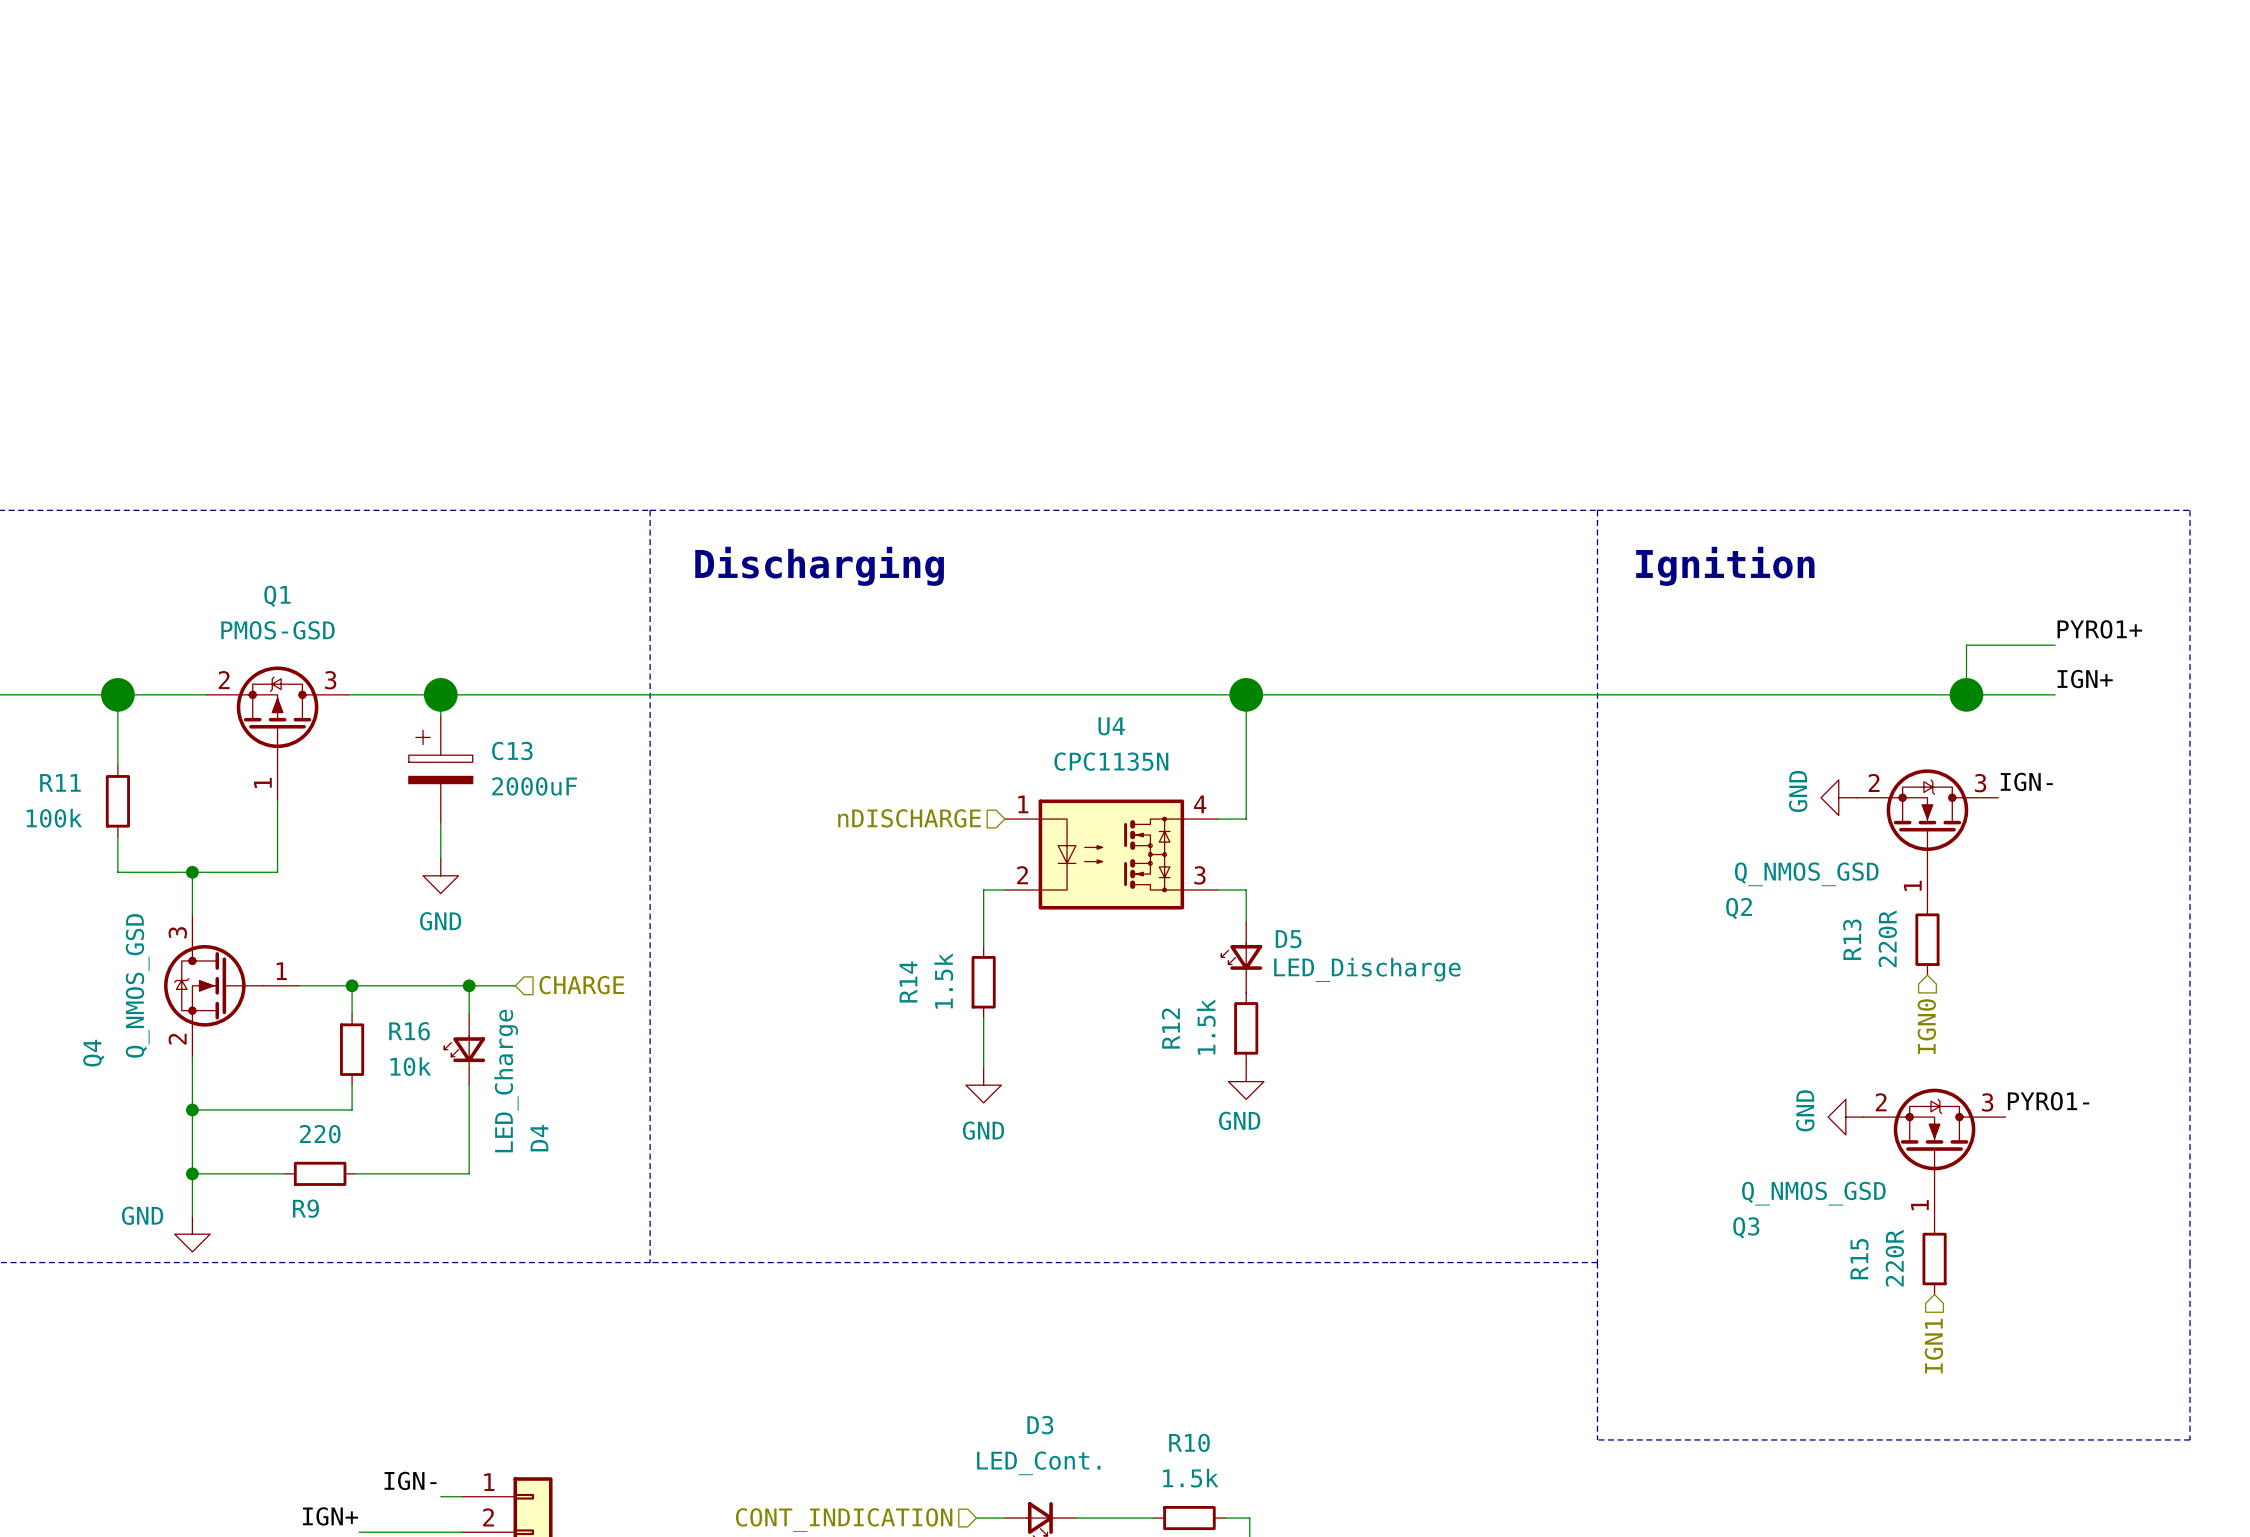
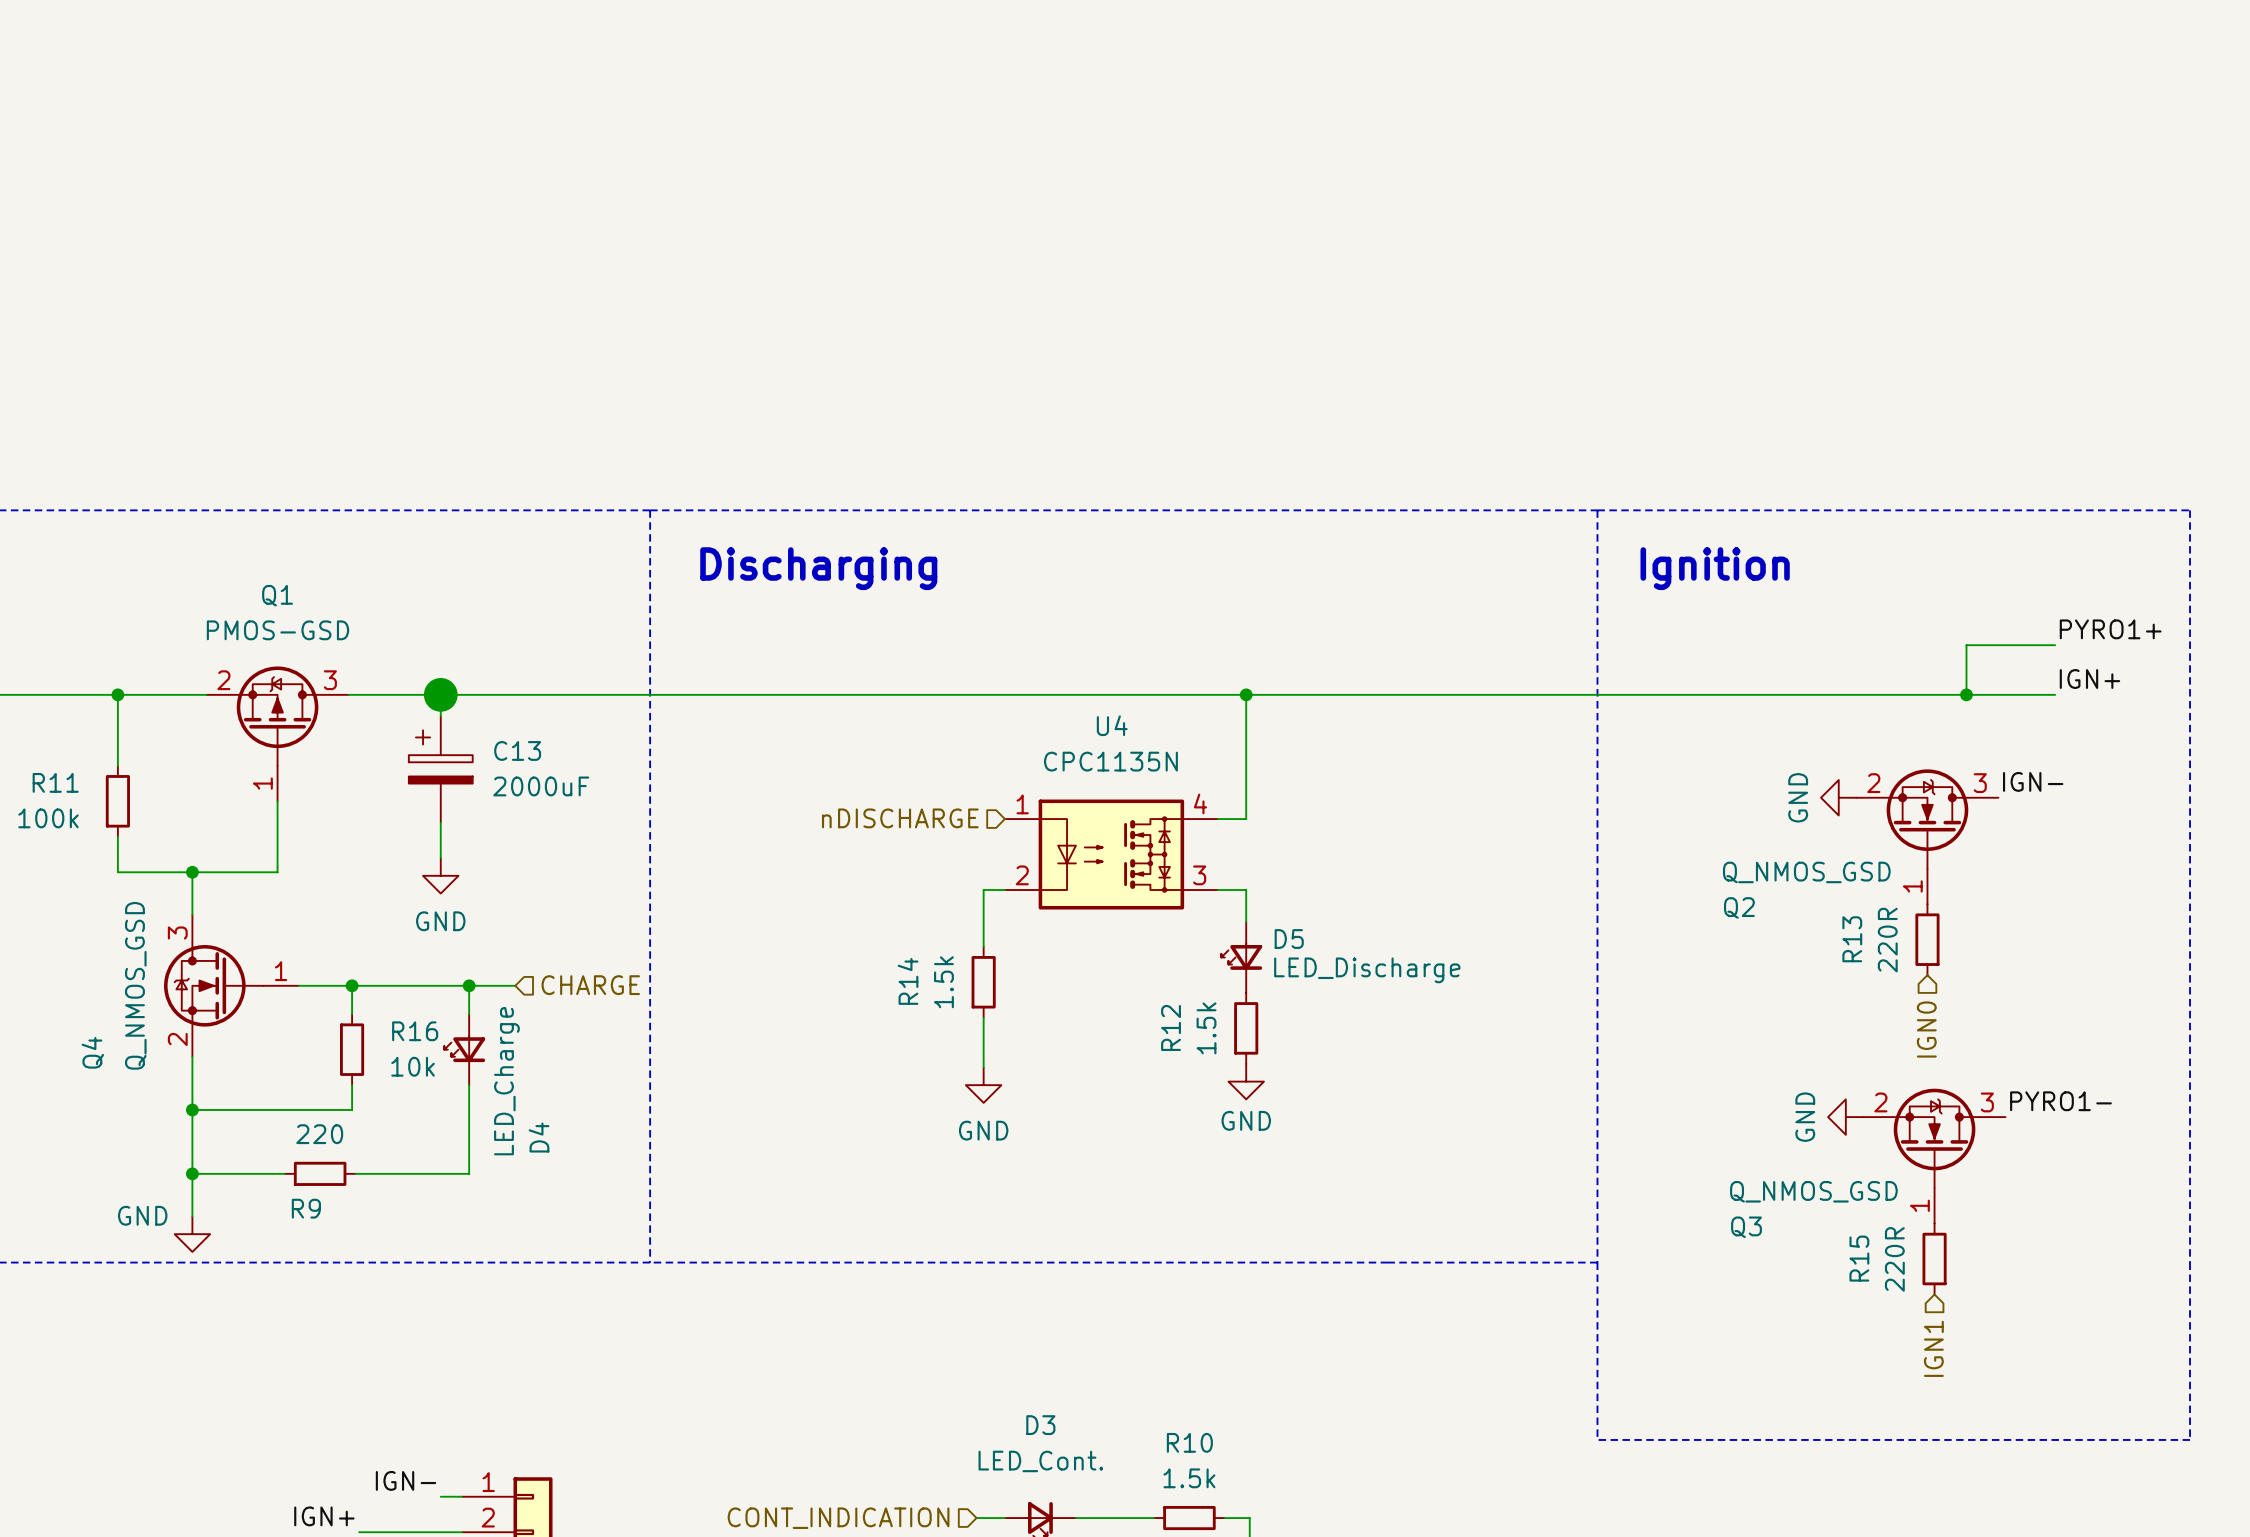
junction size: [101, 678, 135, 712] -> [111, 688, 125, 702]
junction size: [1229, 678, 1264, 712] -> [1239, 688, 1253, 702]
junction size: [1949, 678, 1984, 712] -> [1960, 688, 1973, 702]

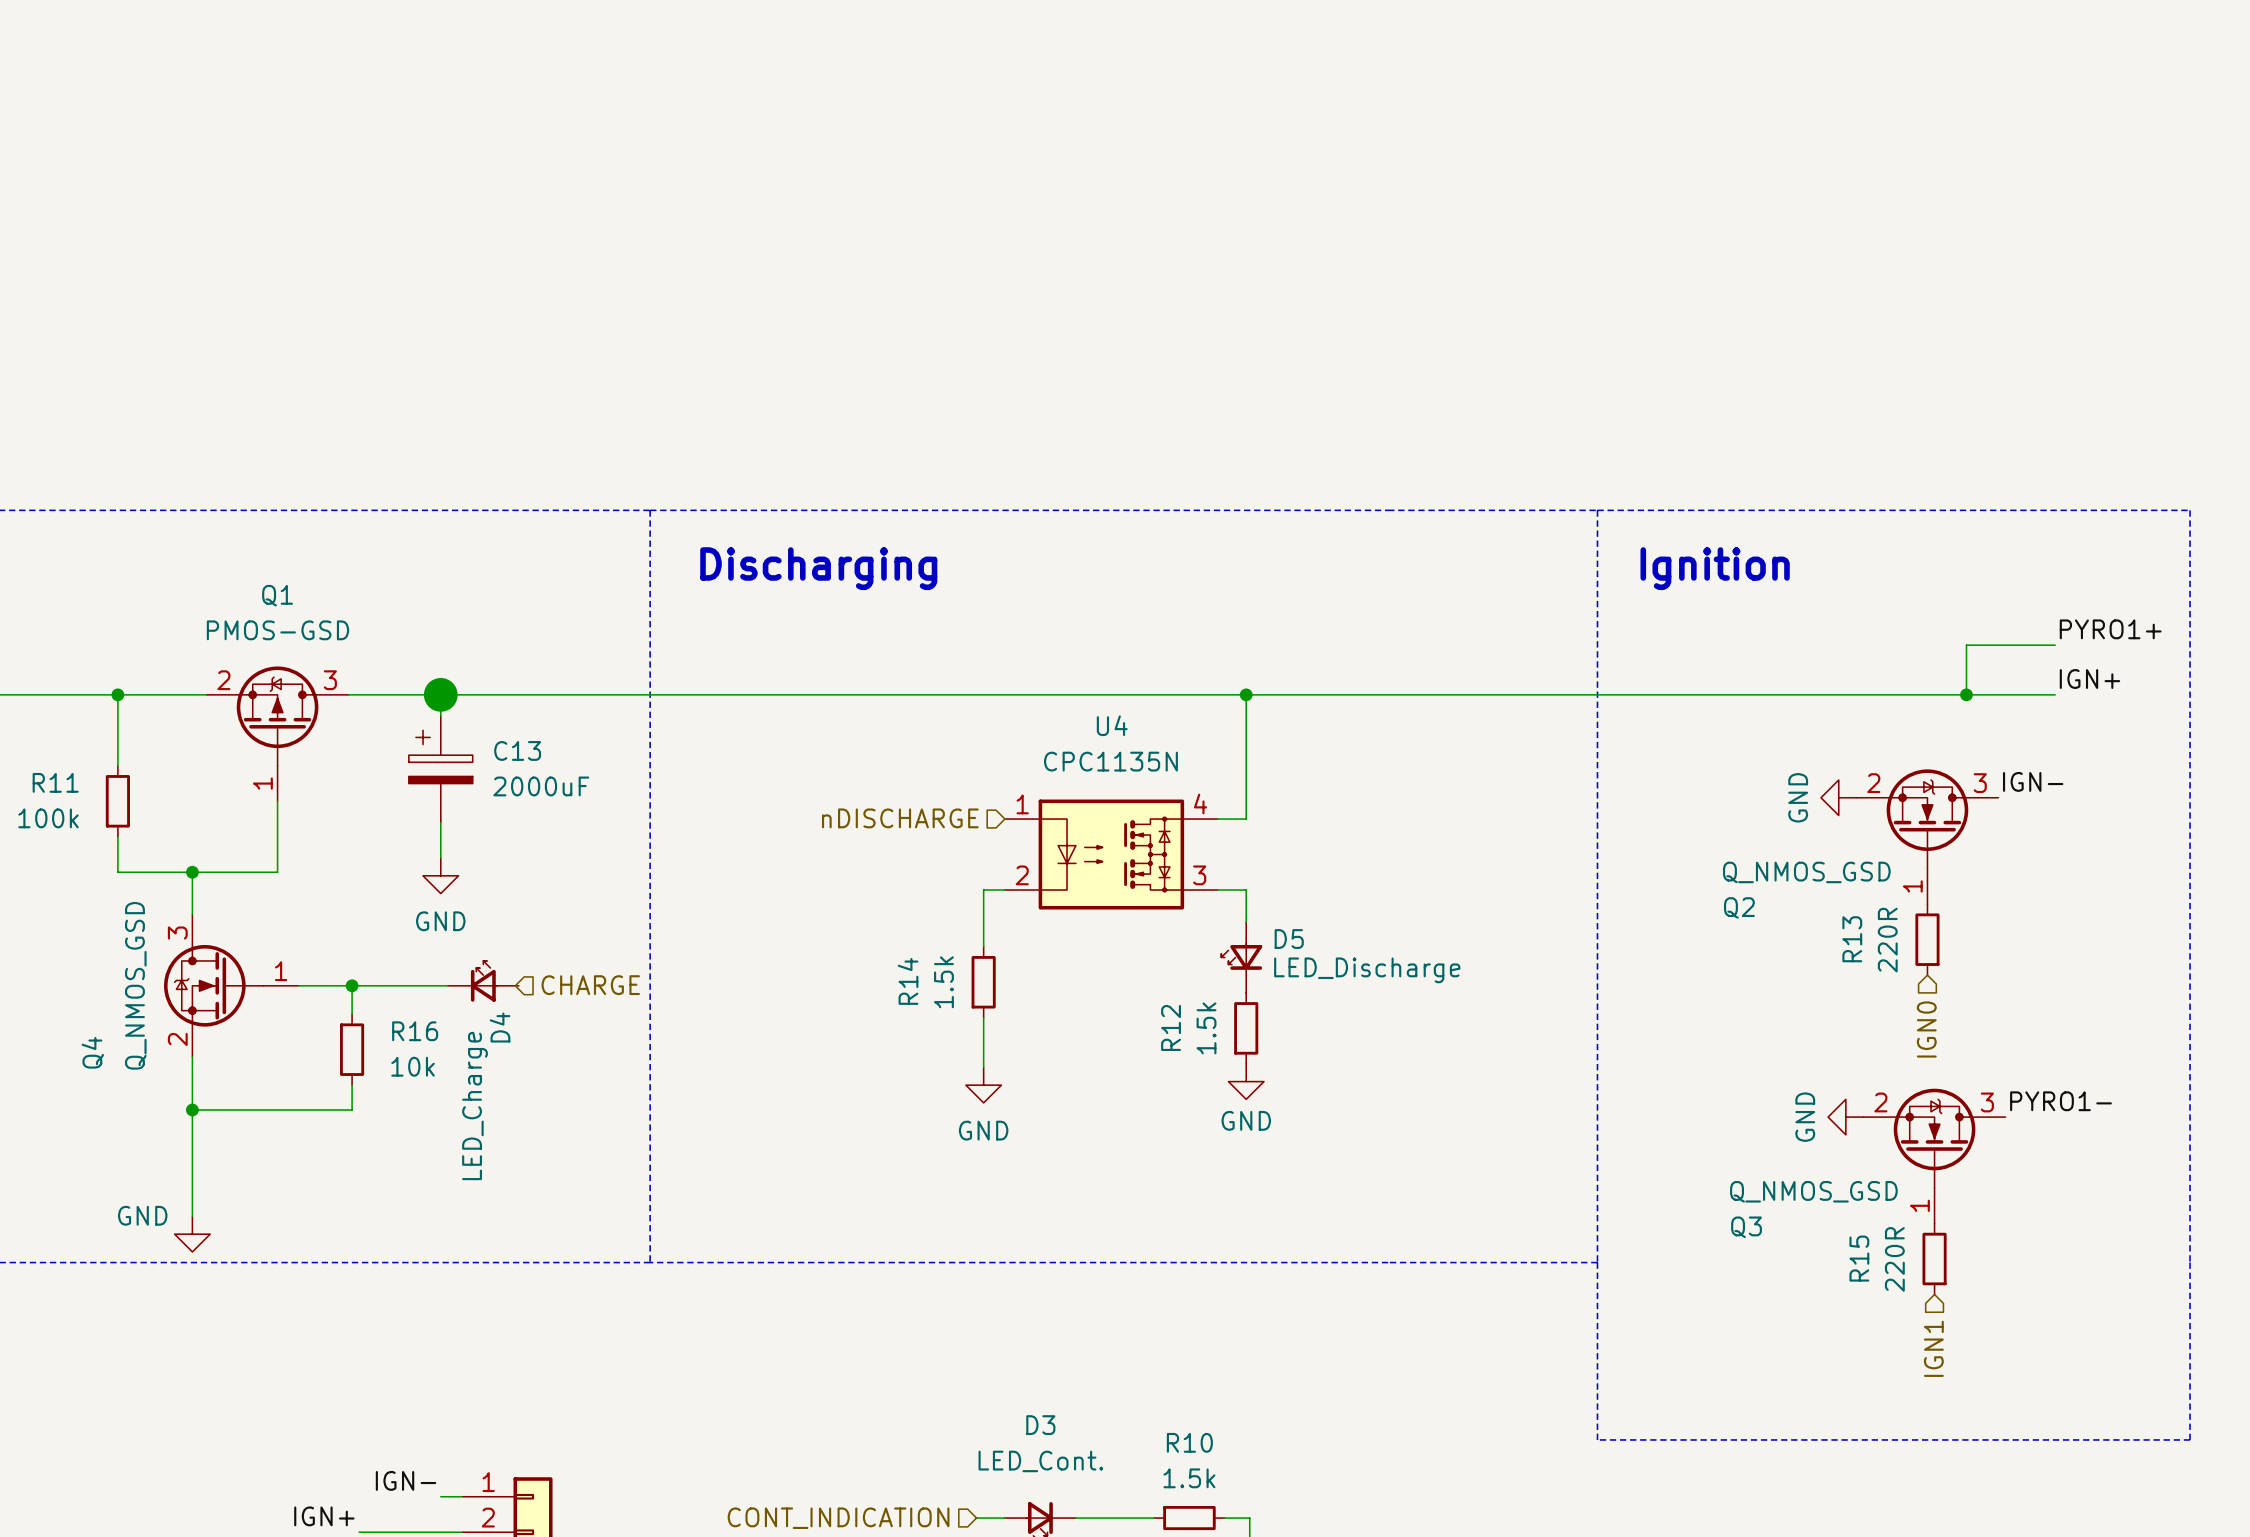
wire: (469, 985) (469, 1014) -> none
junction: (469, 985) -> none
D4 rotation: 0° (464, 1048) -> 90° clockwise (484, 981)
D4 position: (464, 1049) -> (483, 981)
D4 value position: LED_Charge (506, 1081) -> LED_Charge (475, 1106)
wire: (469, 1085) (469, 1173) (355, 1173) -> none
D4 name position: D4 (539, 1137) -> D4 (500, 1027)
wire: (192, 1173) (284, 1173) -> none
junction: (192, 1173) -> none
R9: 220 (320, 1173) -> none

